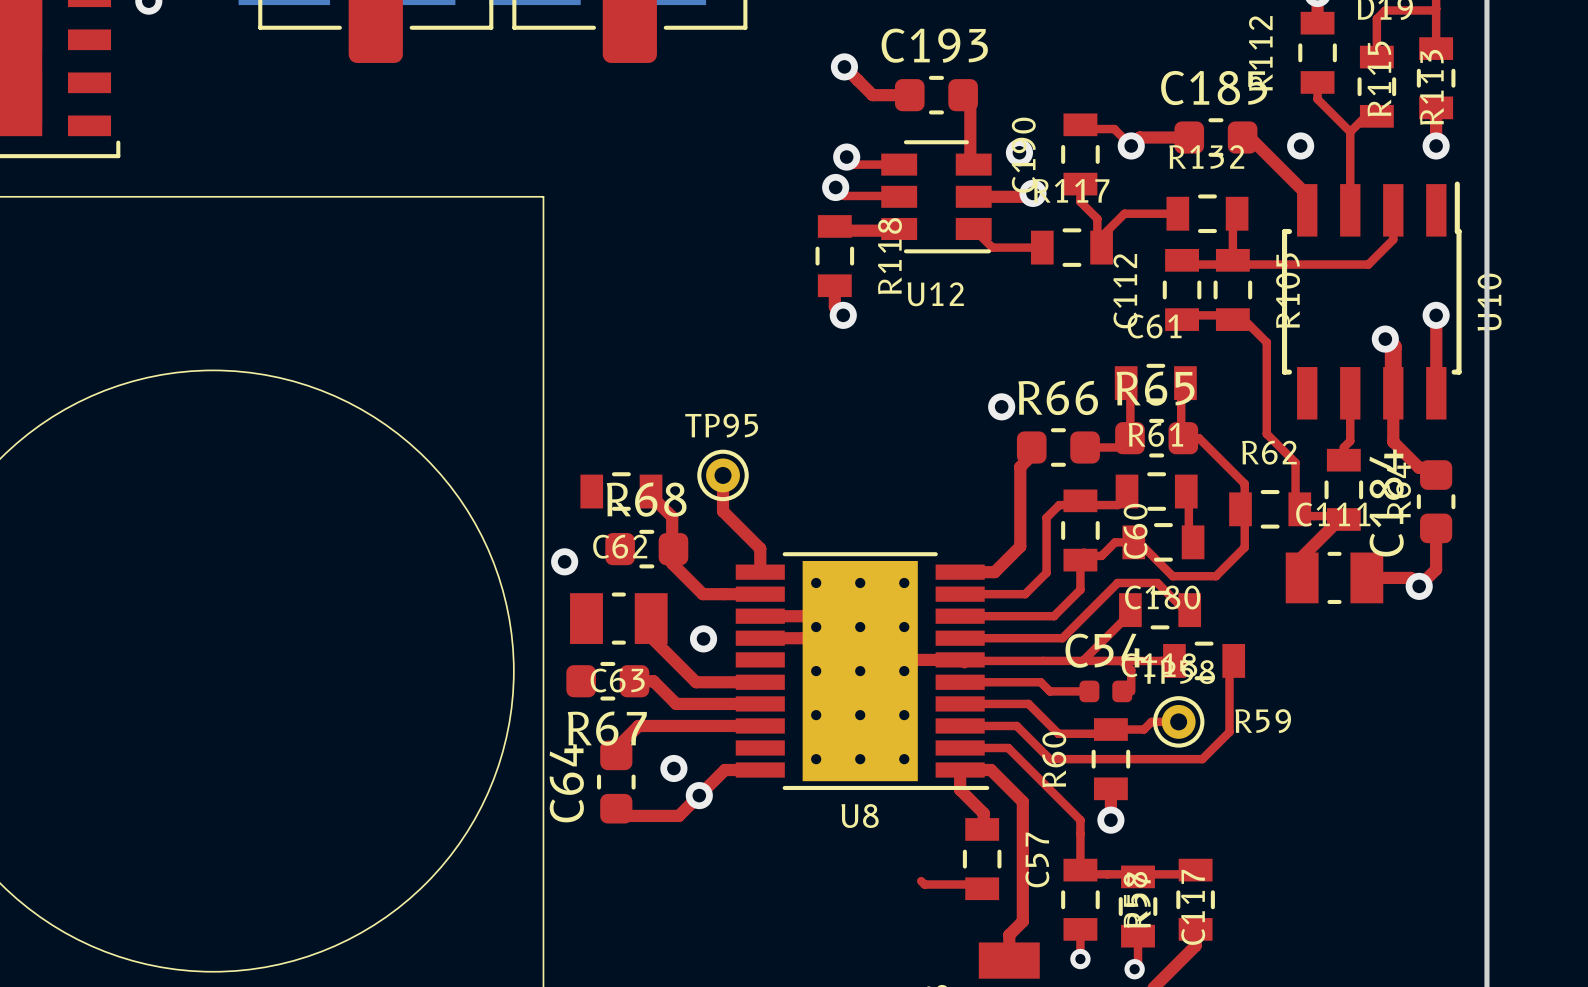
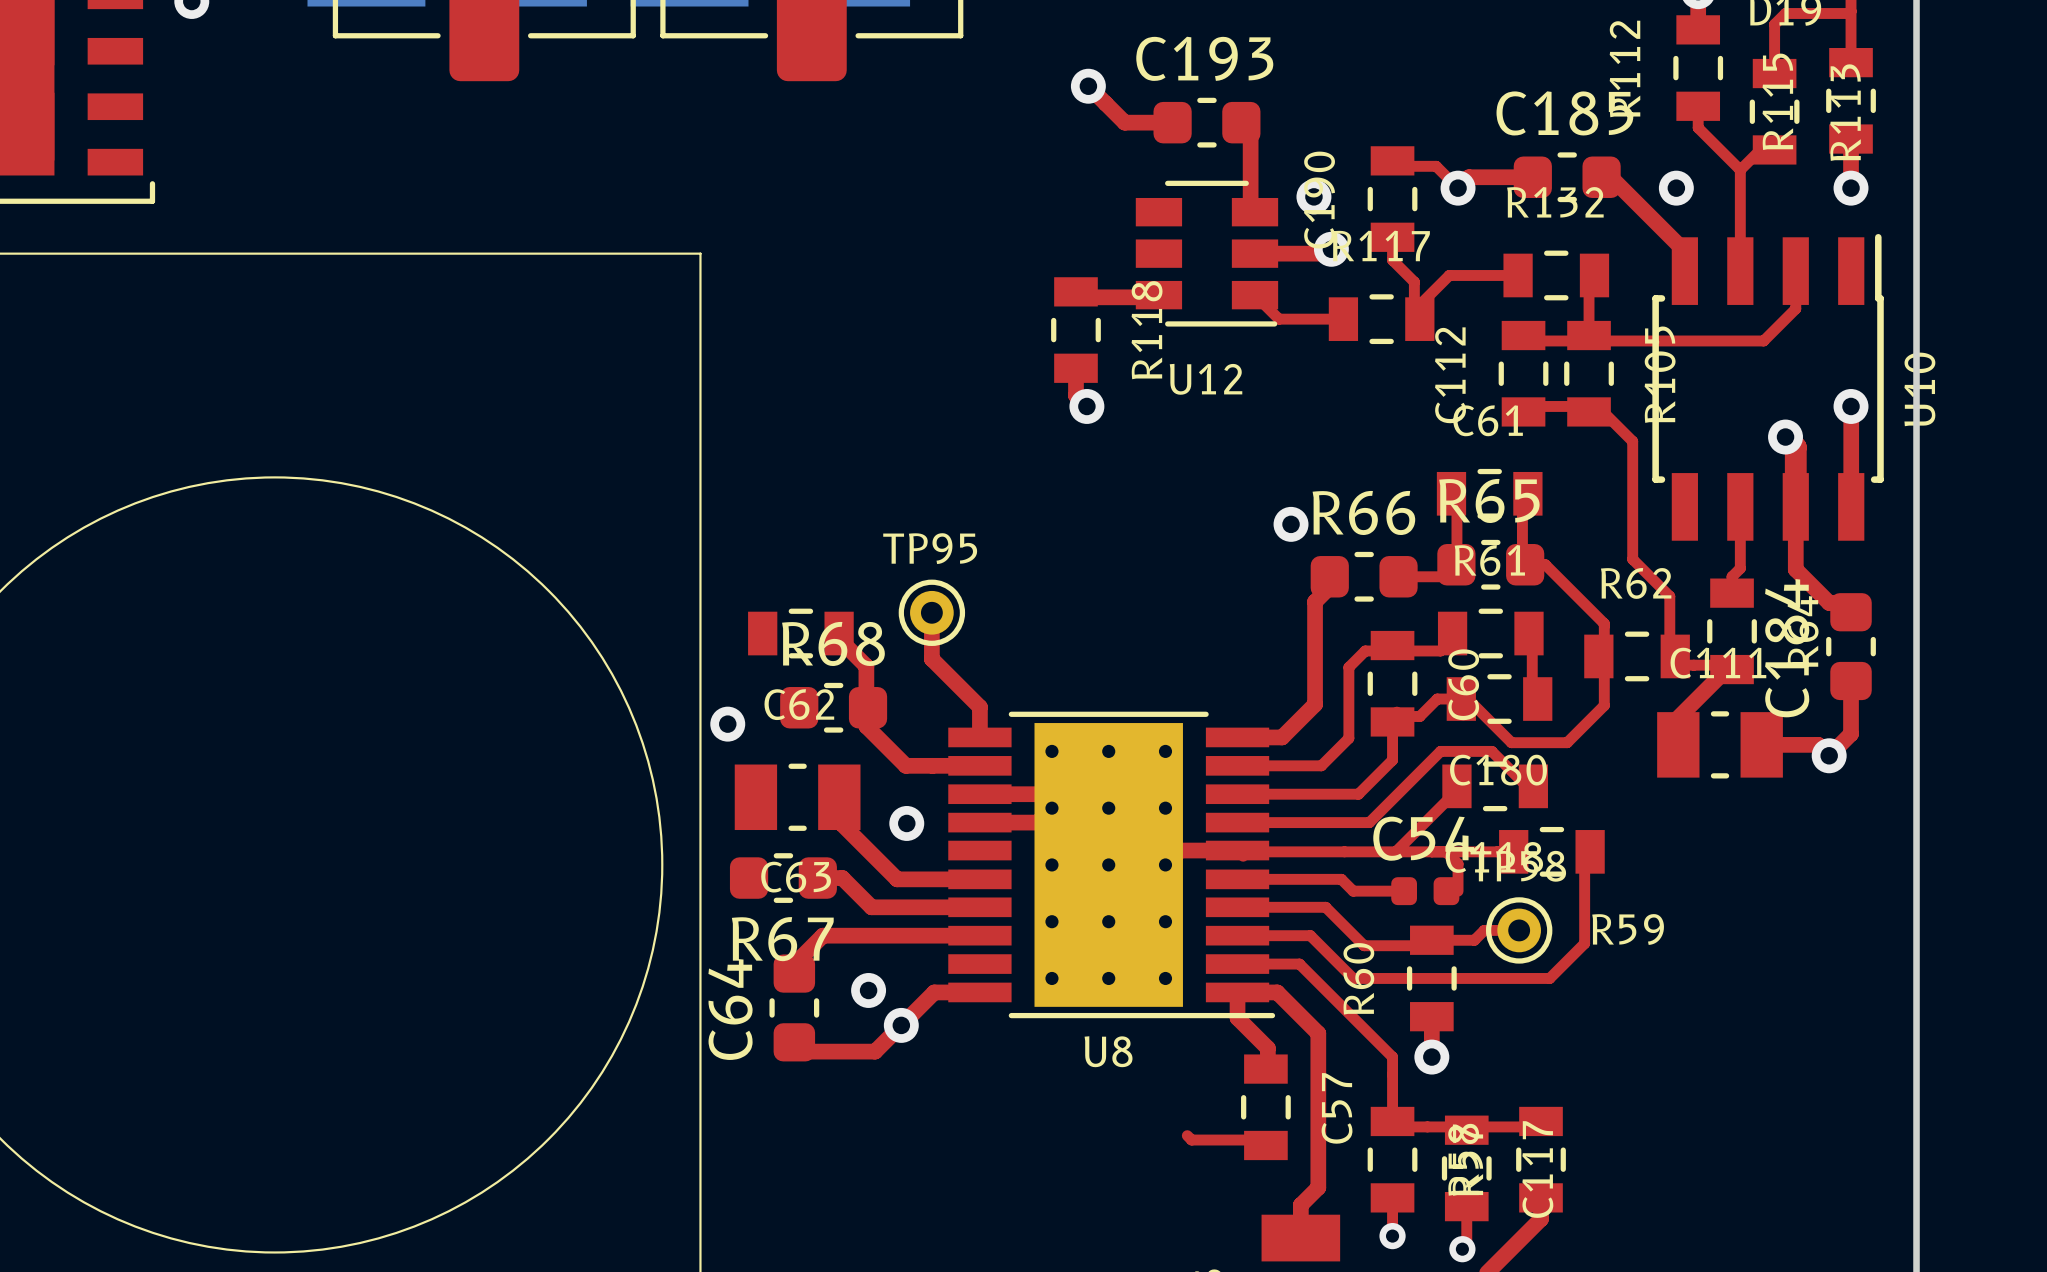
top track: (846, 157) (854, 164) (899, 164) -> none
via: (846, 157) -> none
top track: (835, 187) (844, 195) (899, 196) -> none
via: (835, 187) -> none

